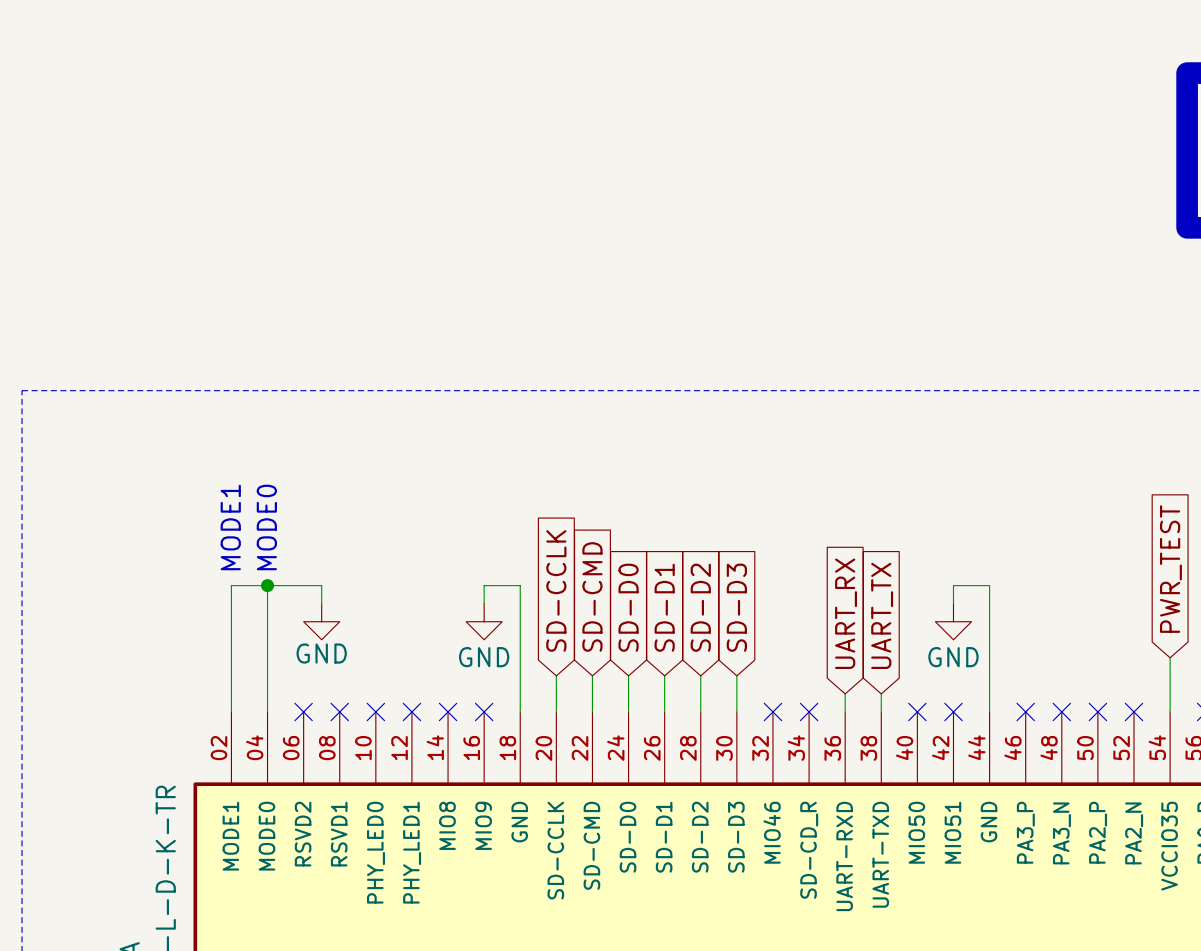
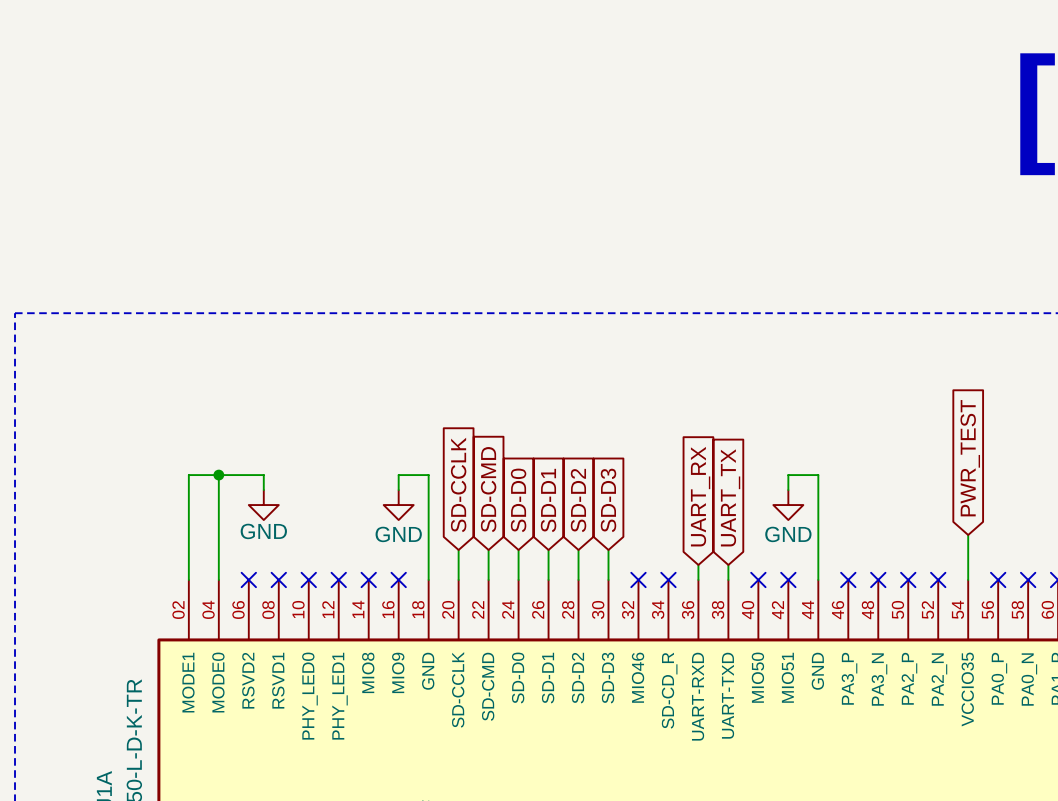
text: MODE1 (230, 527) -> none
text: MODE0 (266, 527) -> none

